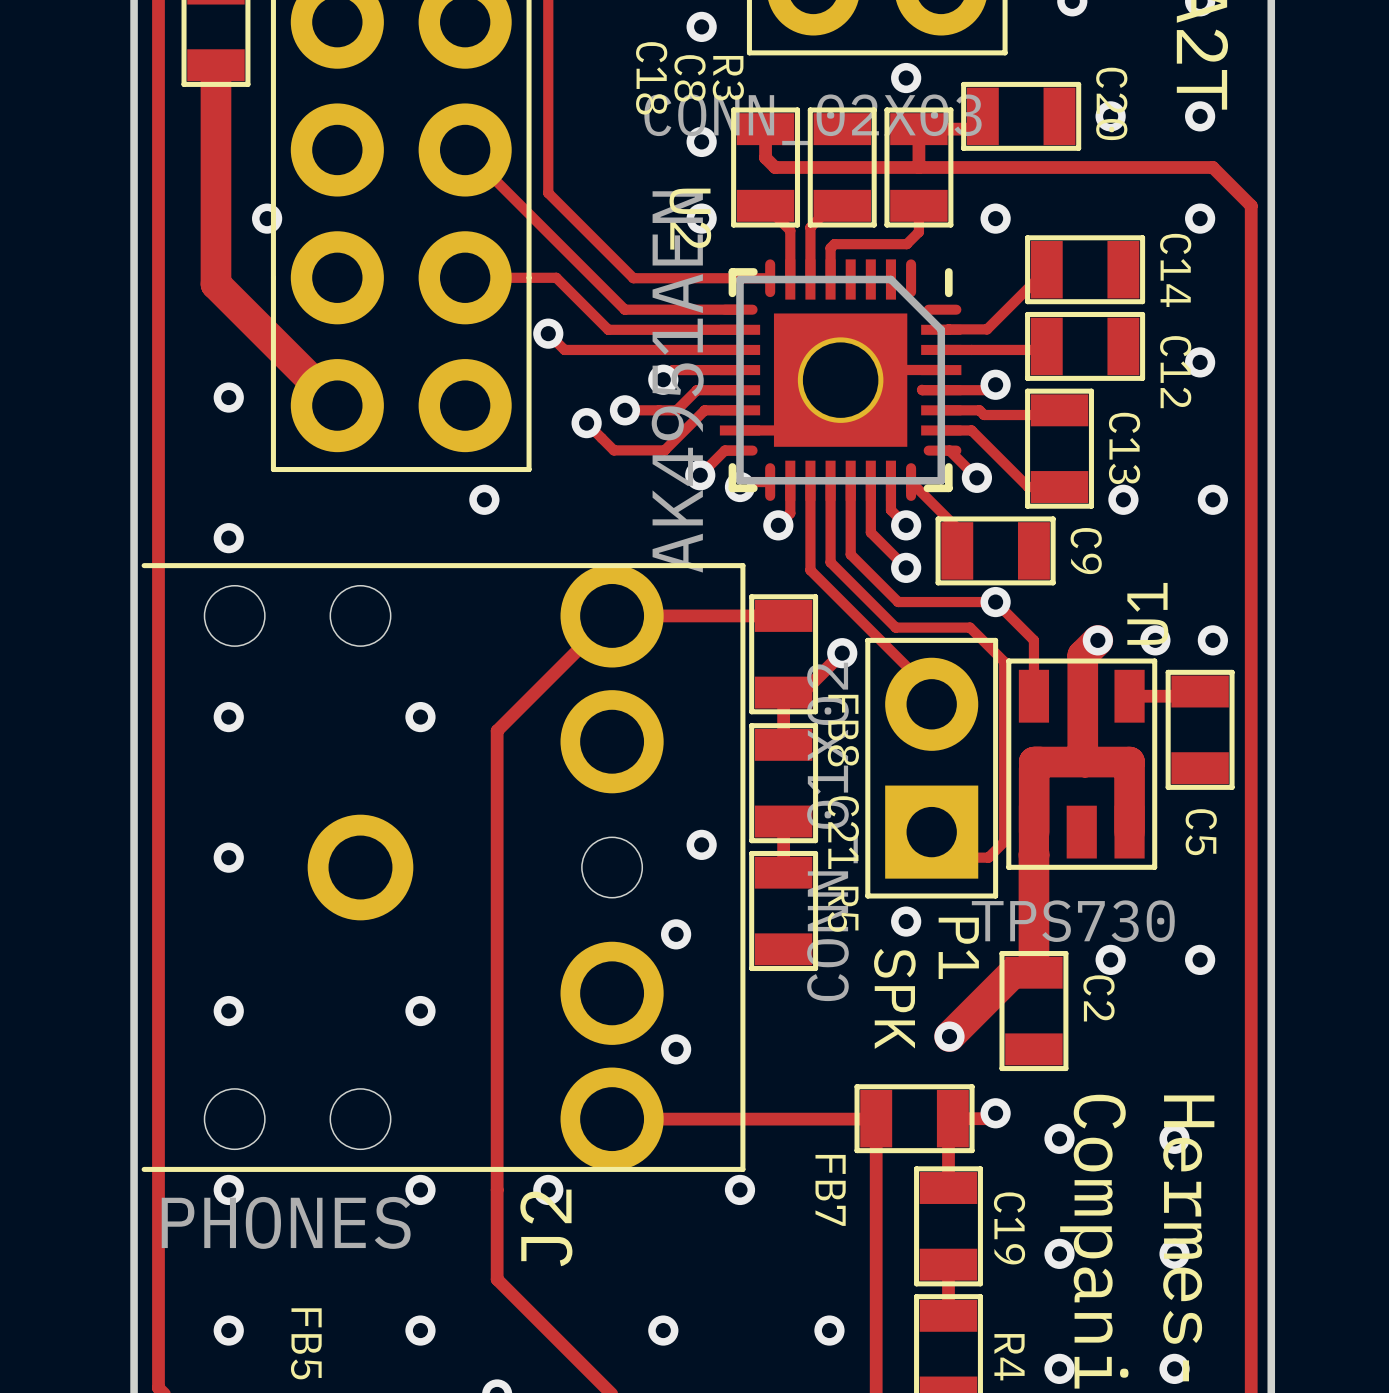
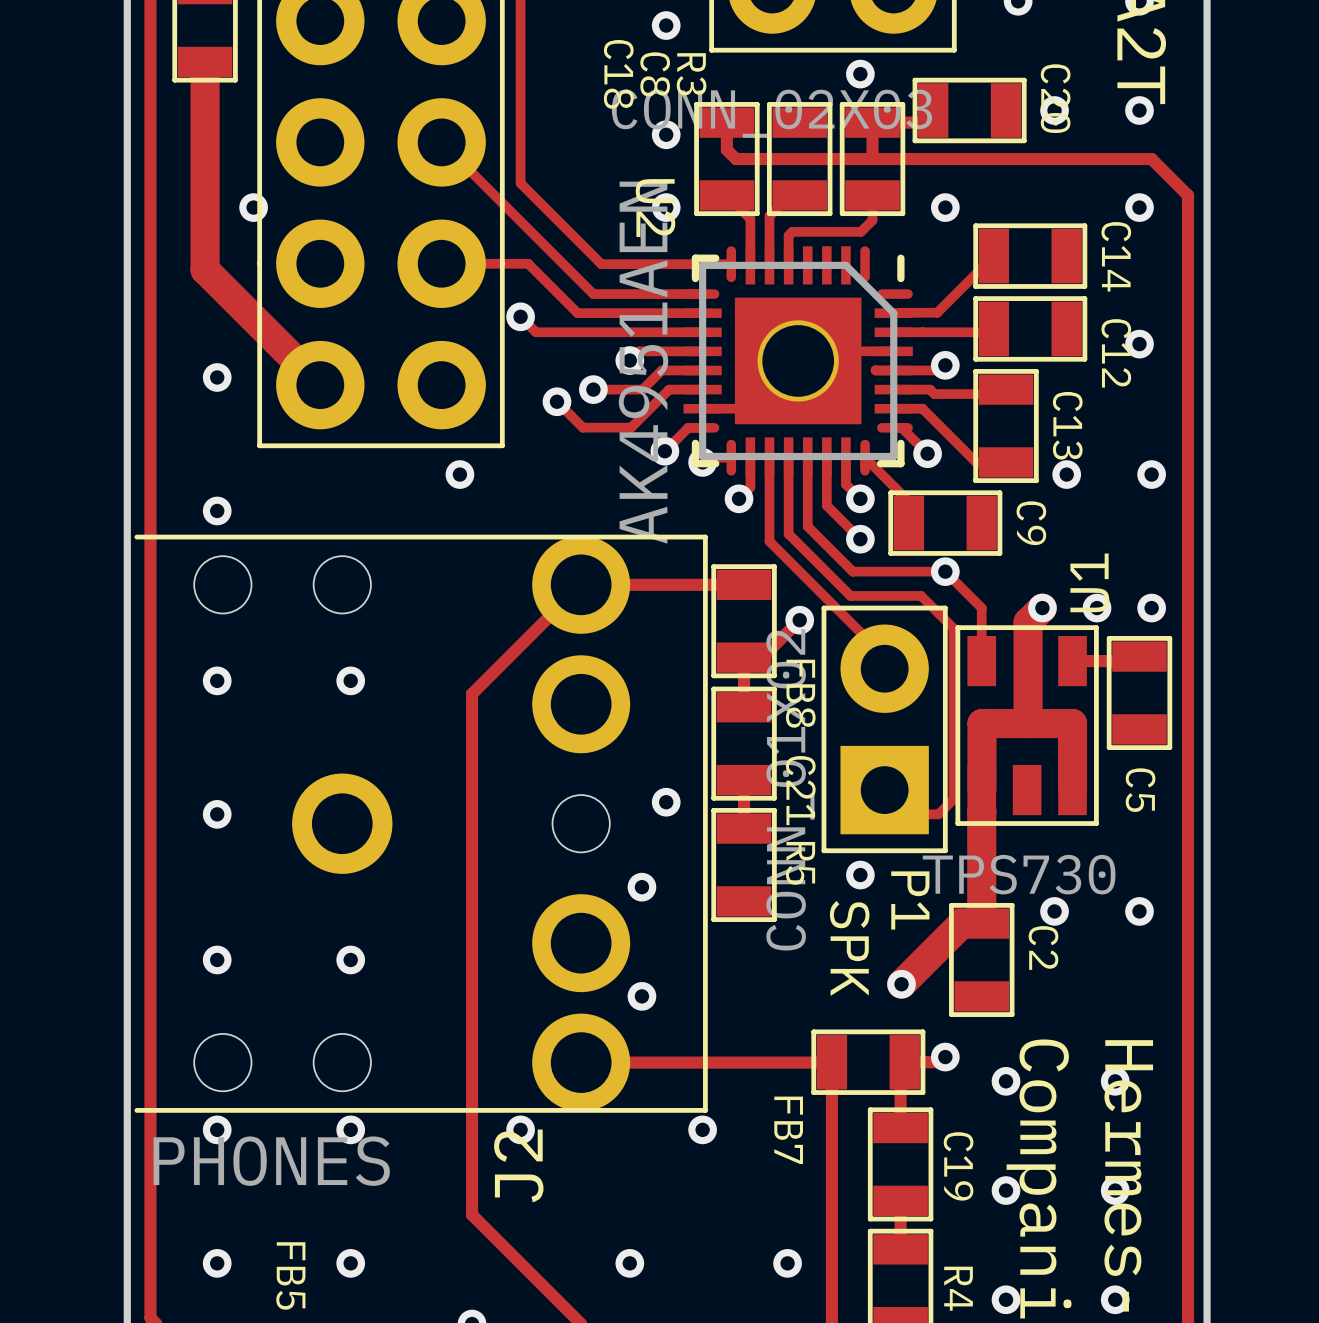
via position: (420, 717) -> (350, 680)
via position: (420, 1011) -> (350, 959)
via position: (420, 1189) -> (350, 1129)
via position: (420, 1330) -> (350, 1263)

